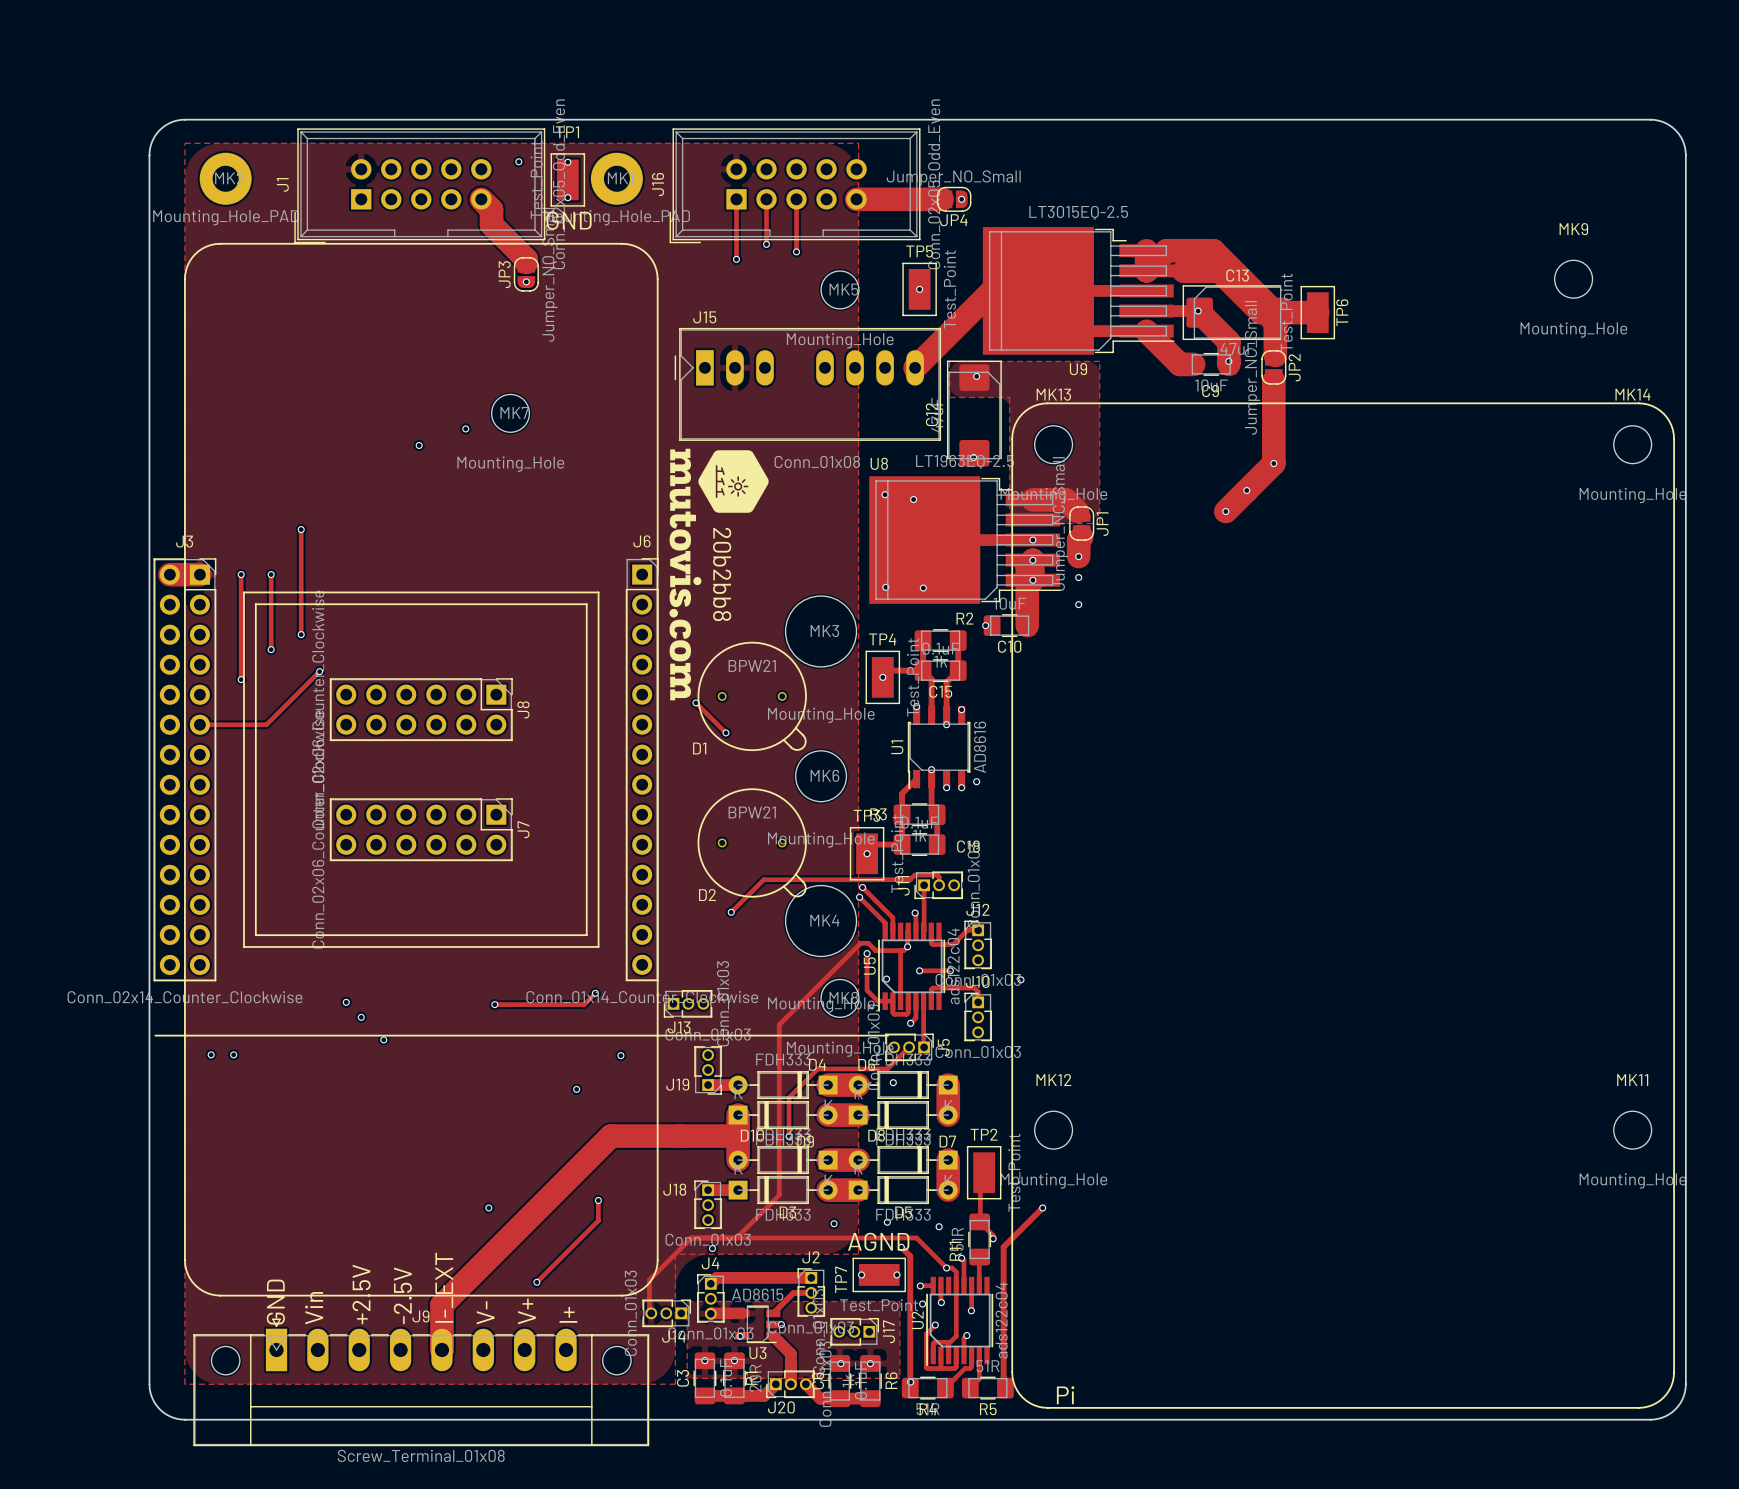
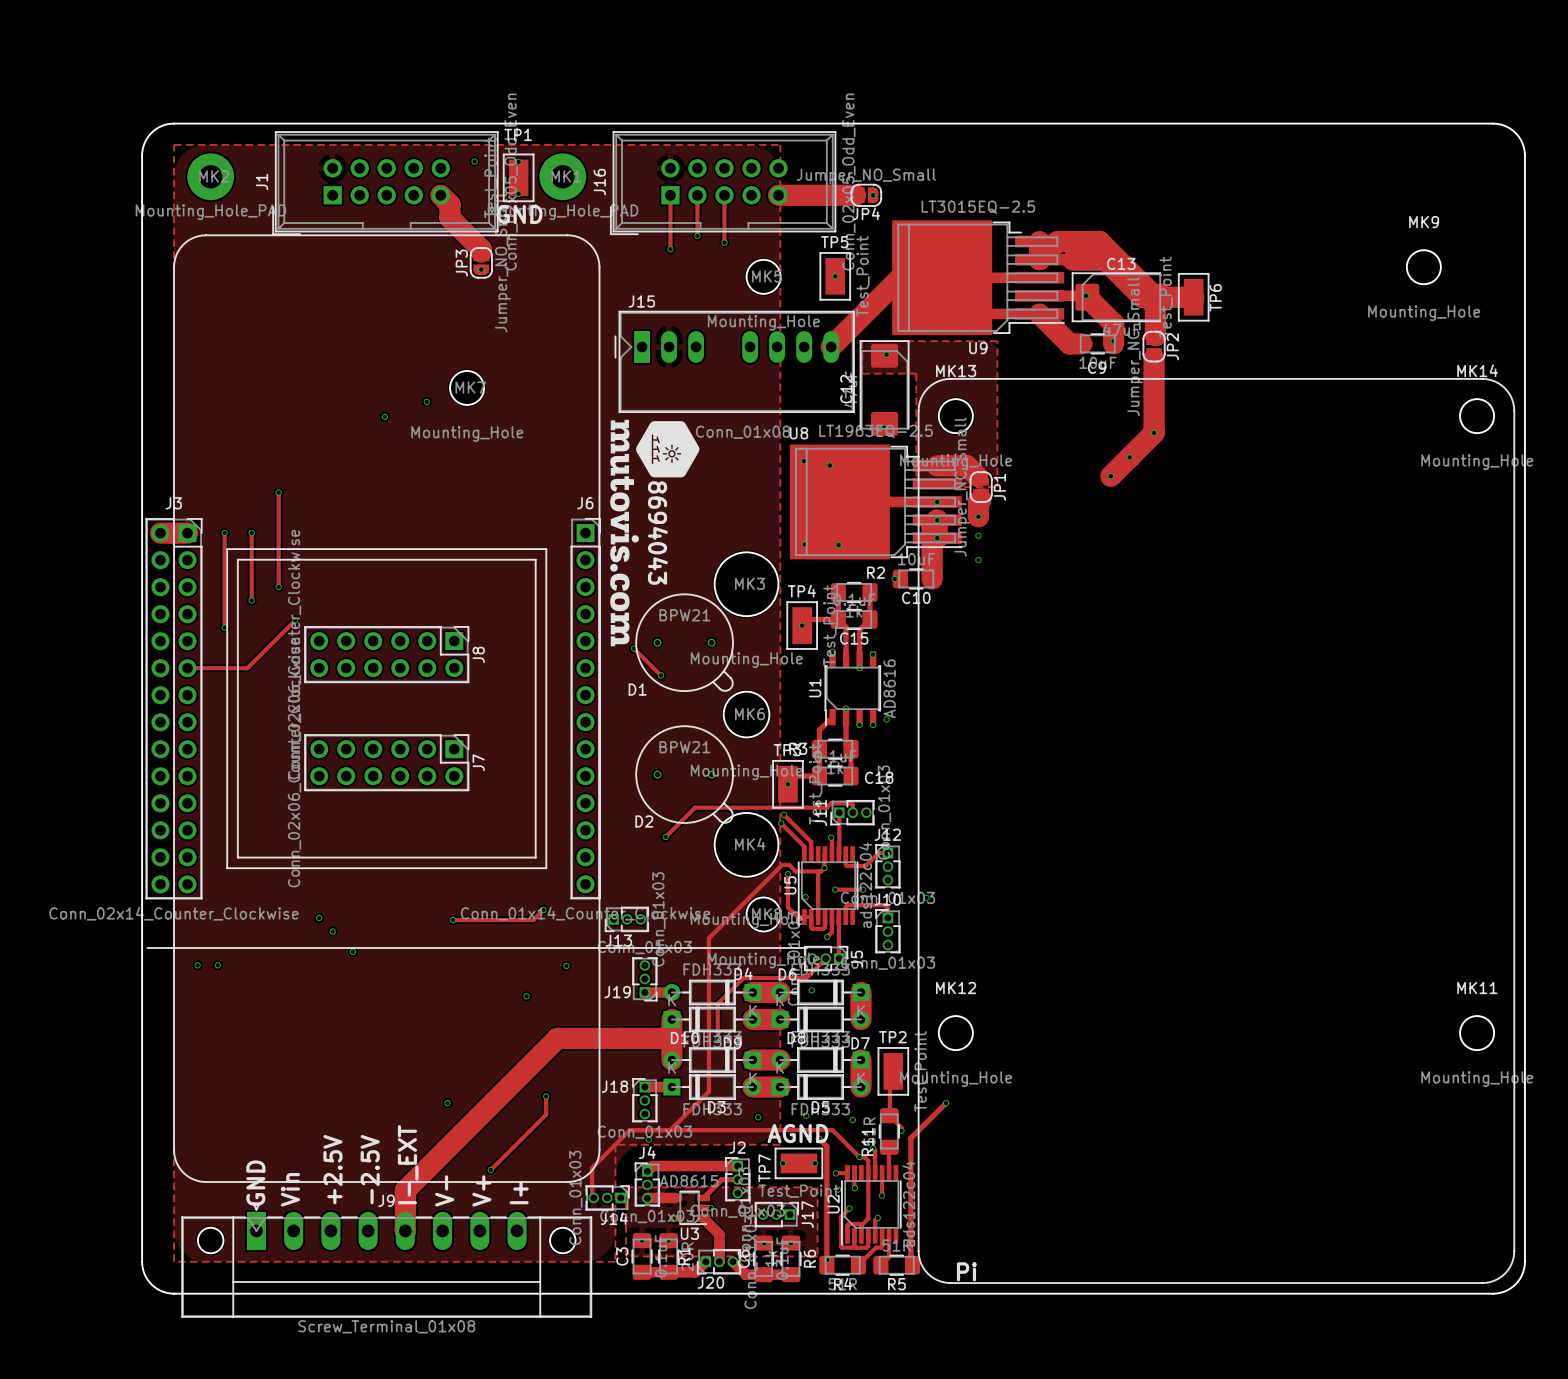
text: 20b2bb8 (722, 574) -> 8694043 (657, 533)

